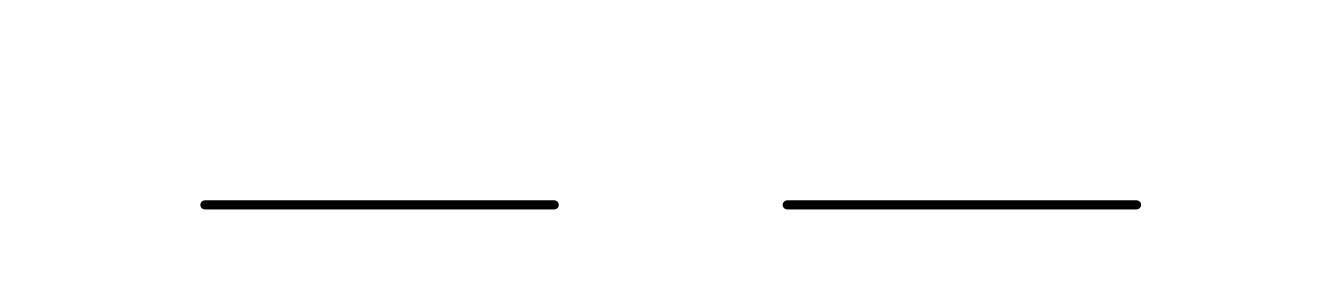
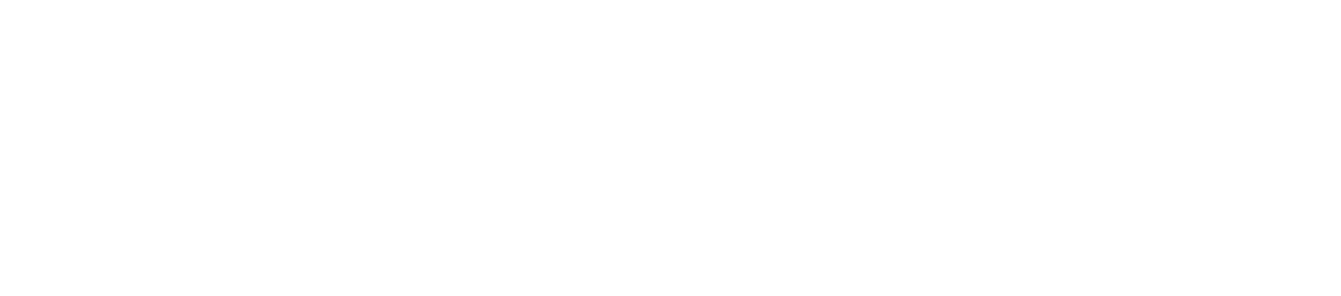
line: (204, 204) (554, 204) -> none
line: (787, 204) (1136, 204) -> none

